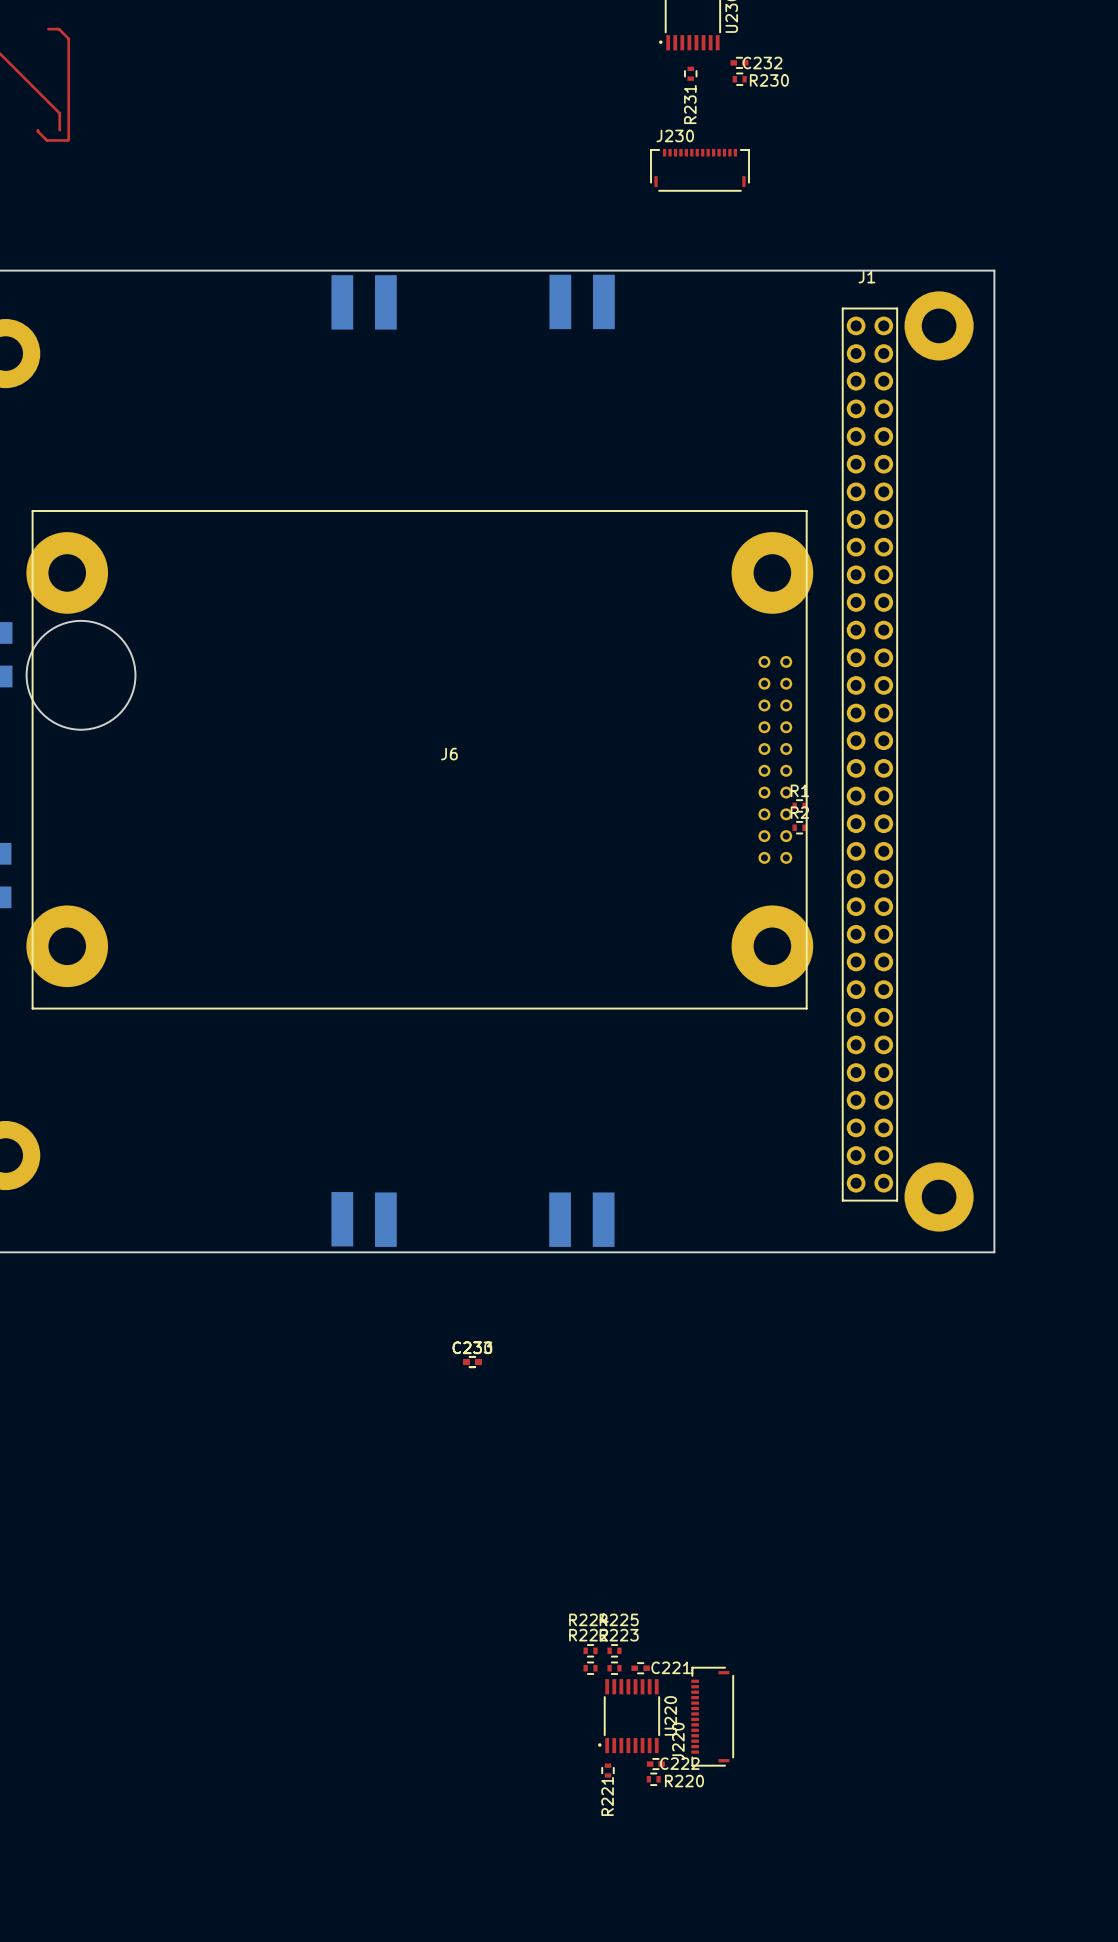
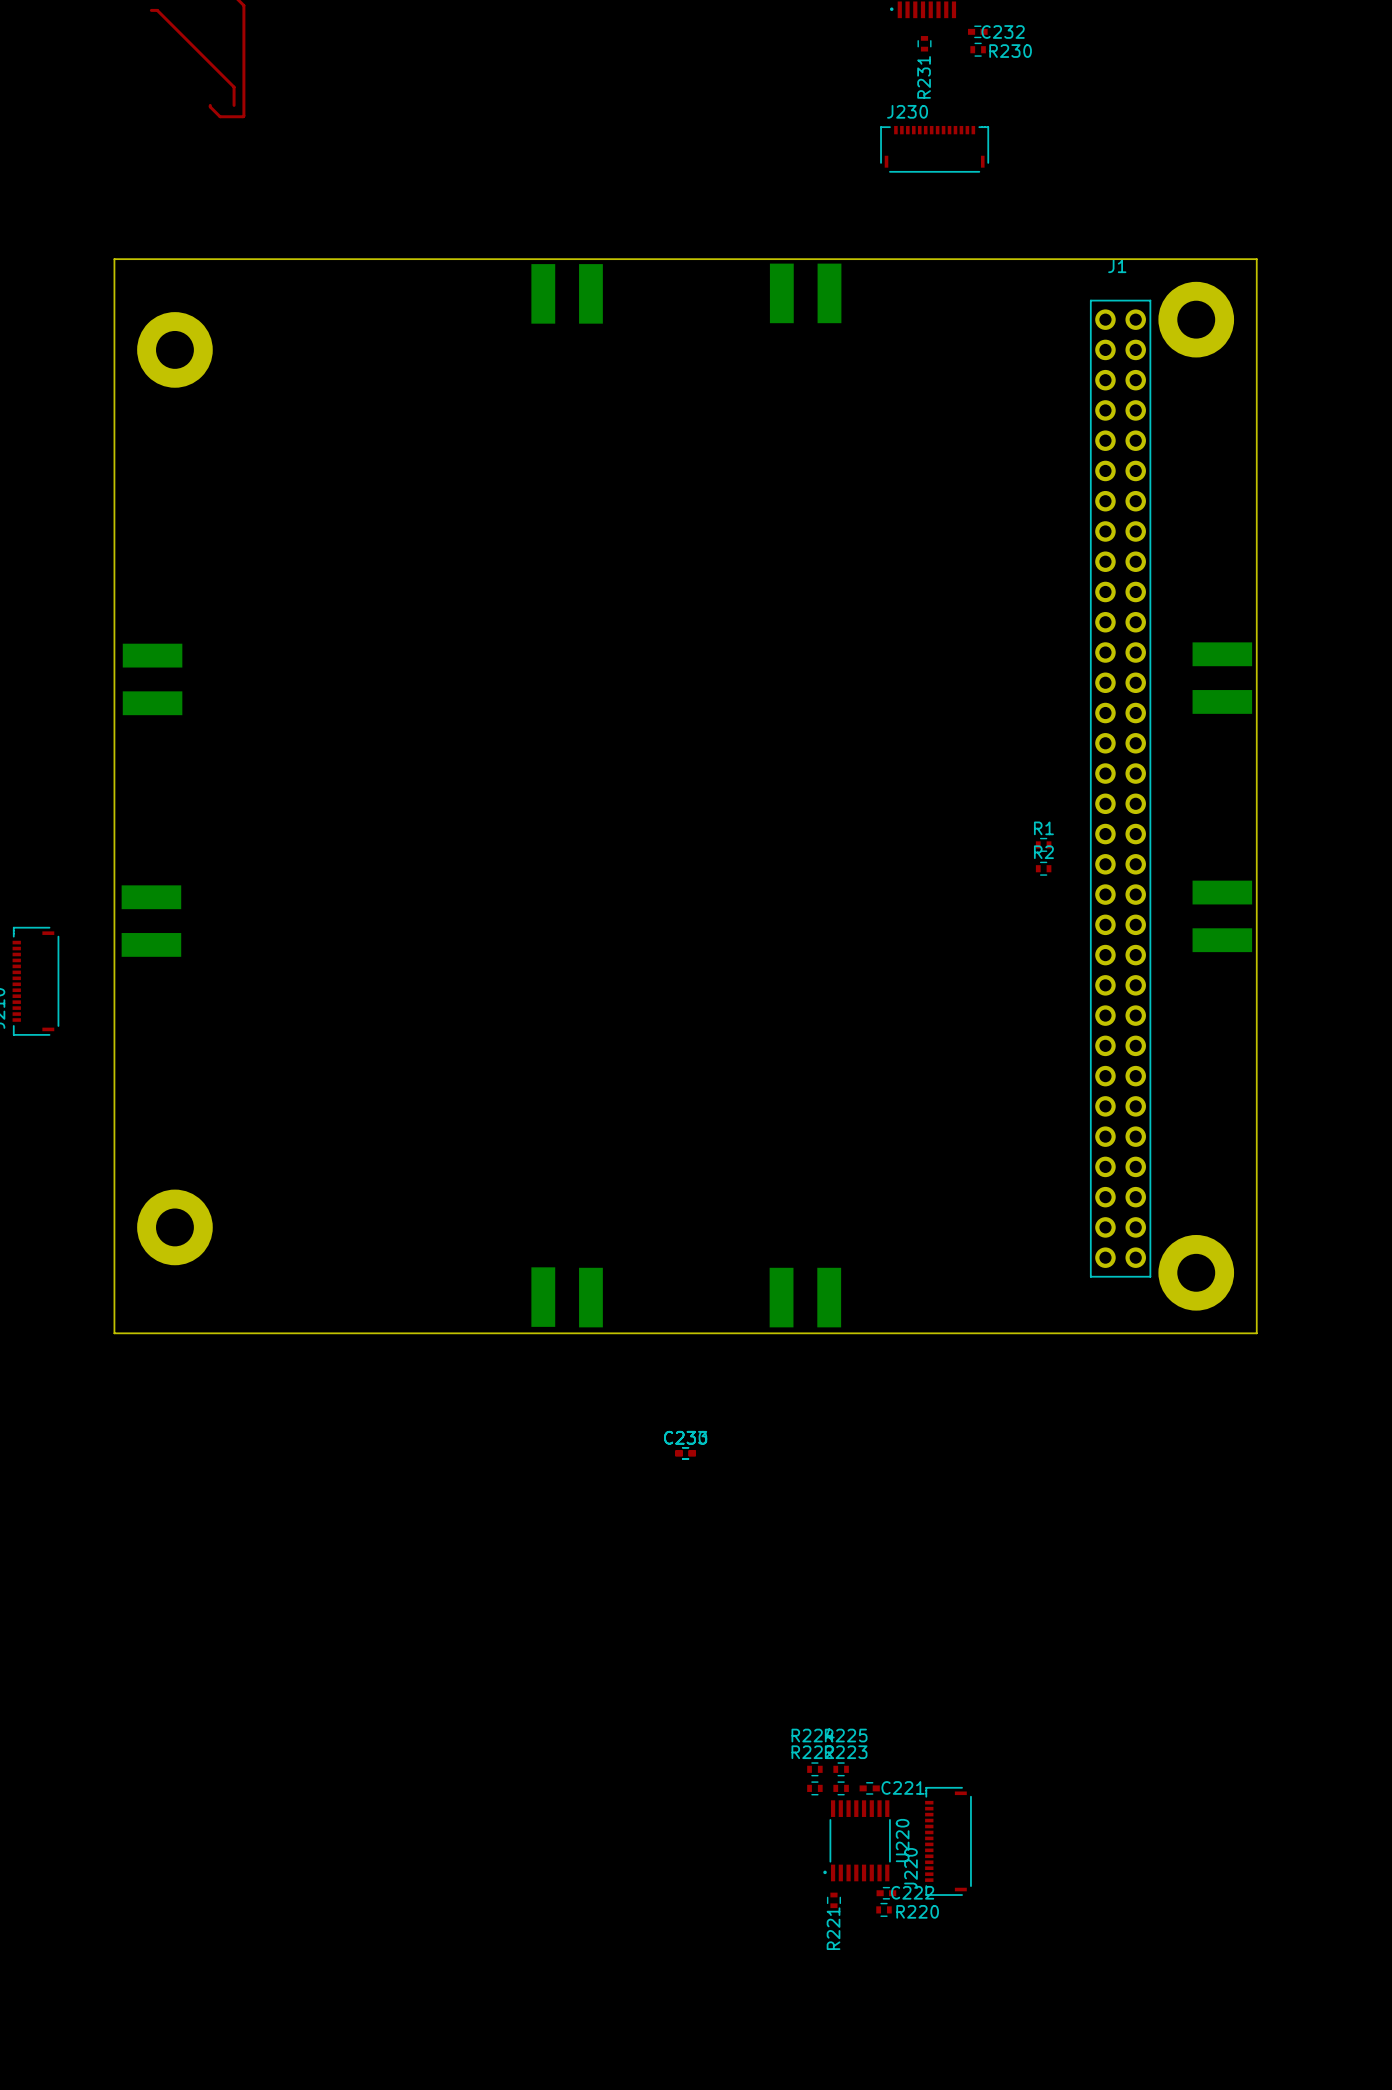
part: none -> (1222, 654)
part: none -> (1222, 701)
J6: (419, 759) -> none
part: none -> (1222, 892)
part: none -> (1222, 940)

